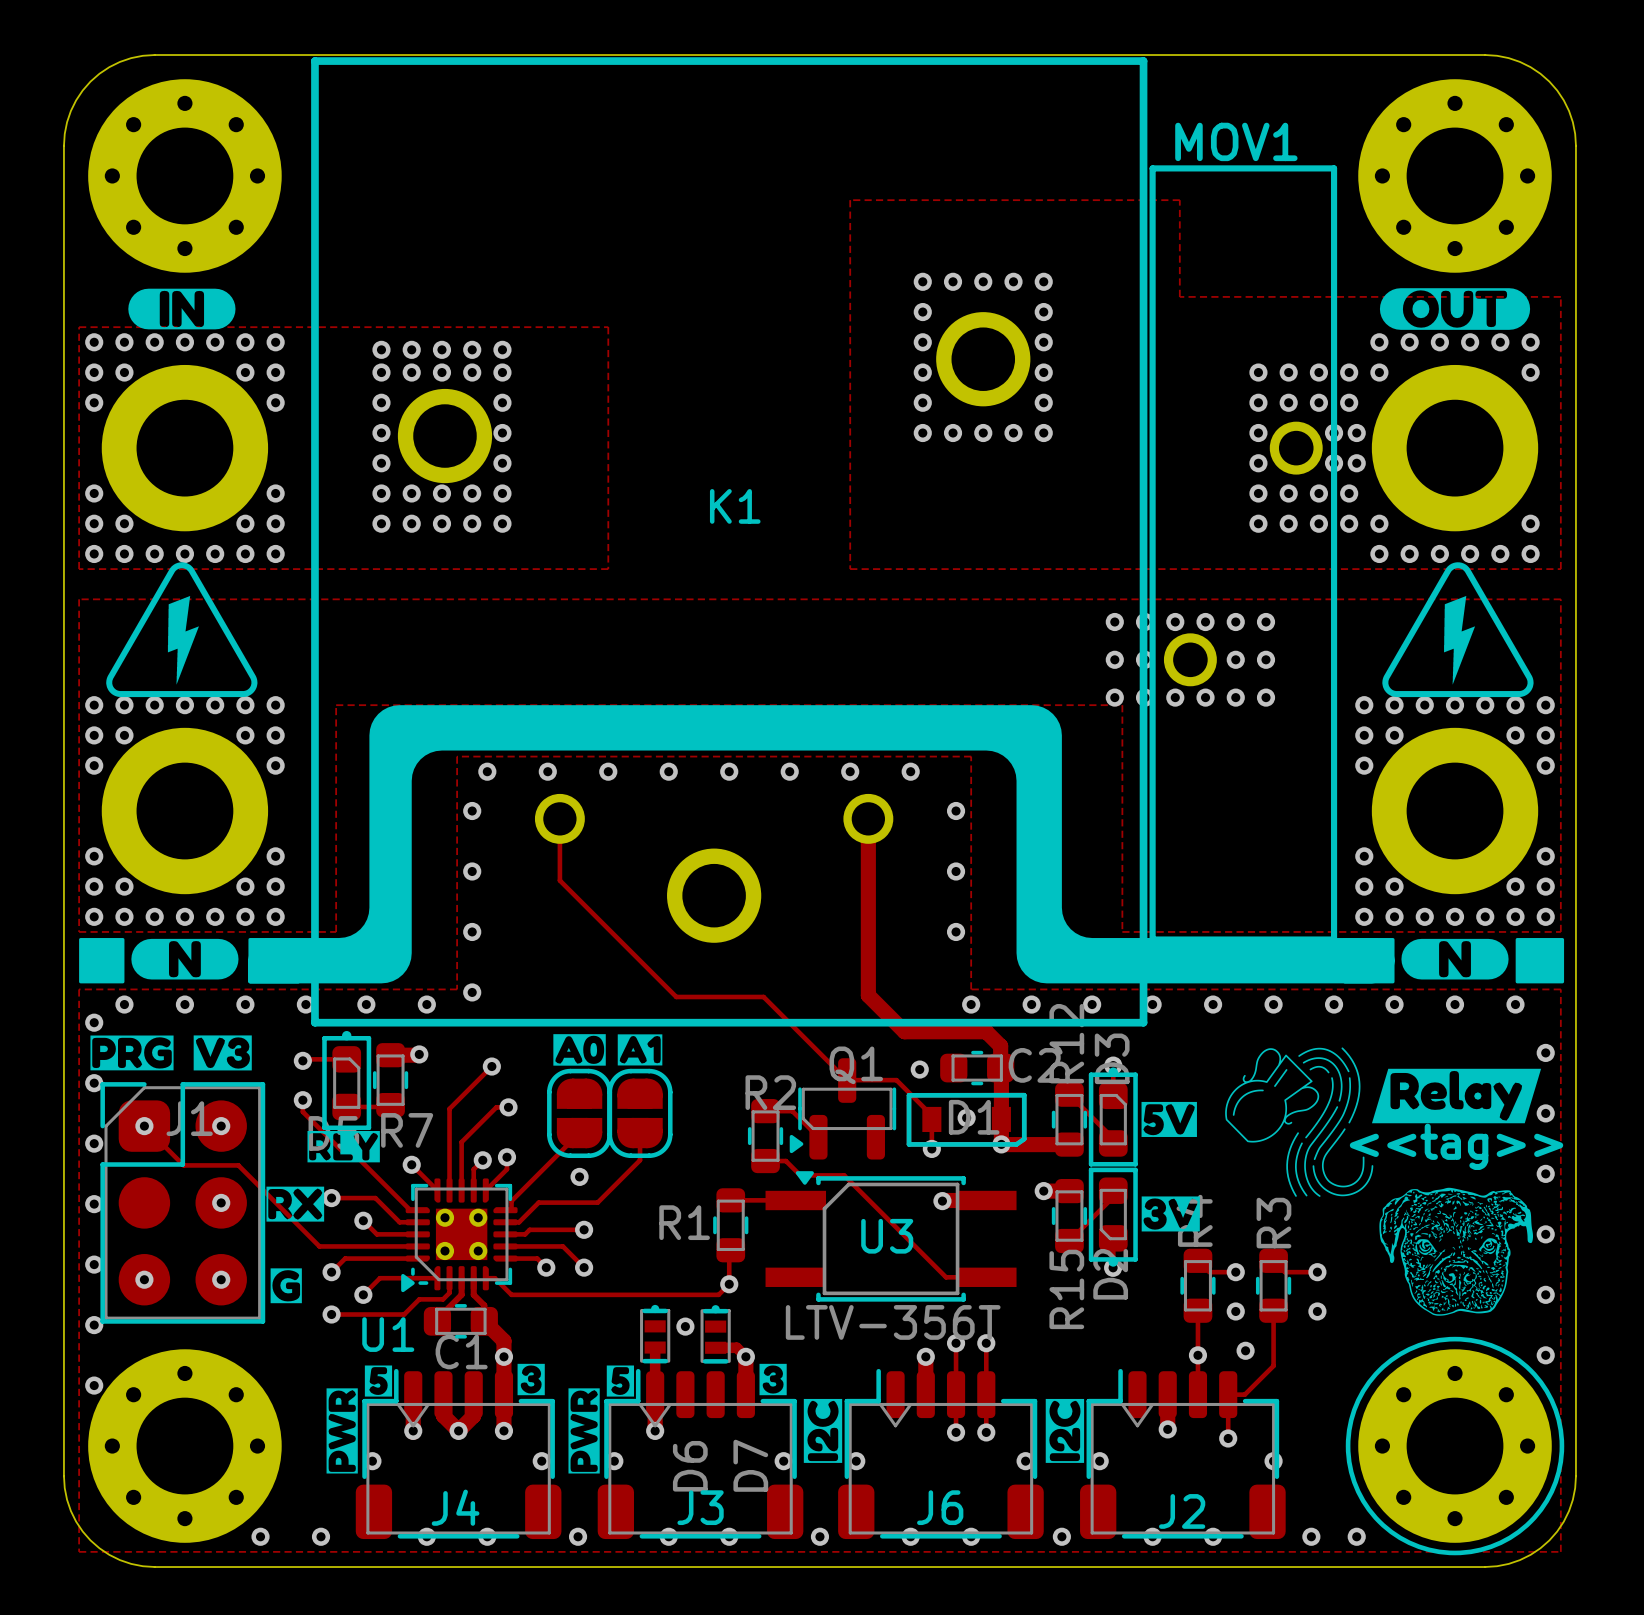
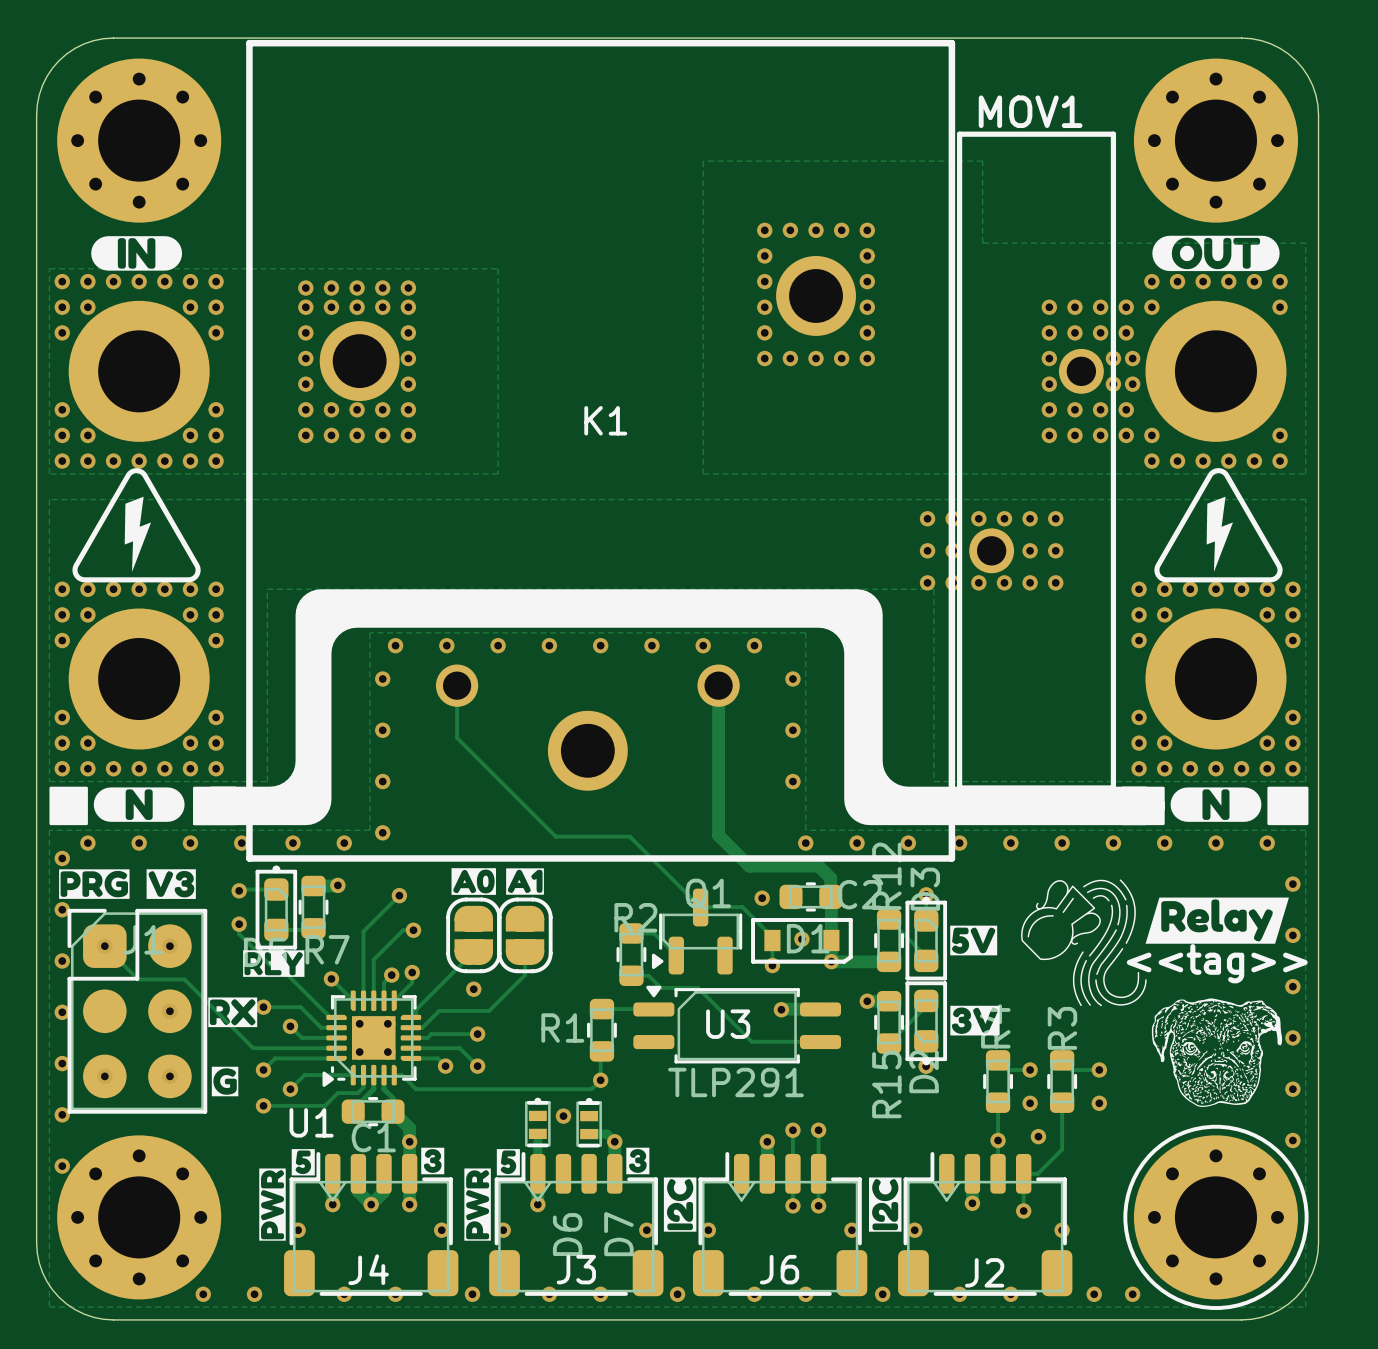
U3 footprint: [765, 1171, 1017, 1302] -> [633, 985, 842, 1064]
track: (907, 1238) (946, 1277) (986, 1277) -> (751, 1041) (820, 1041)
U3 value: LTV-356T (893, 1322) -> TLP291 (735, 1082)

